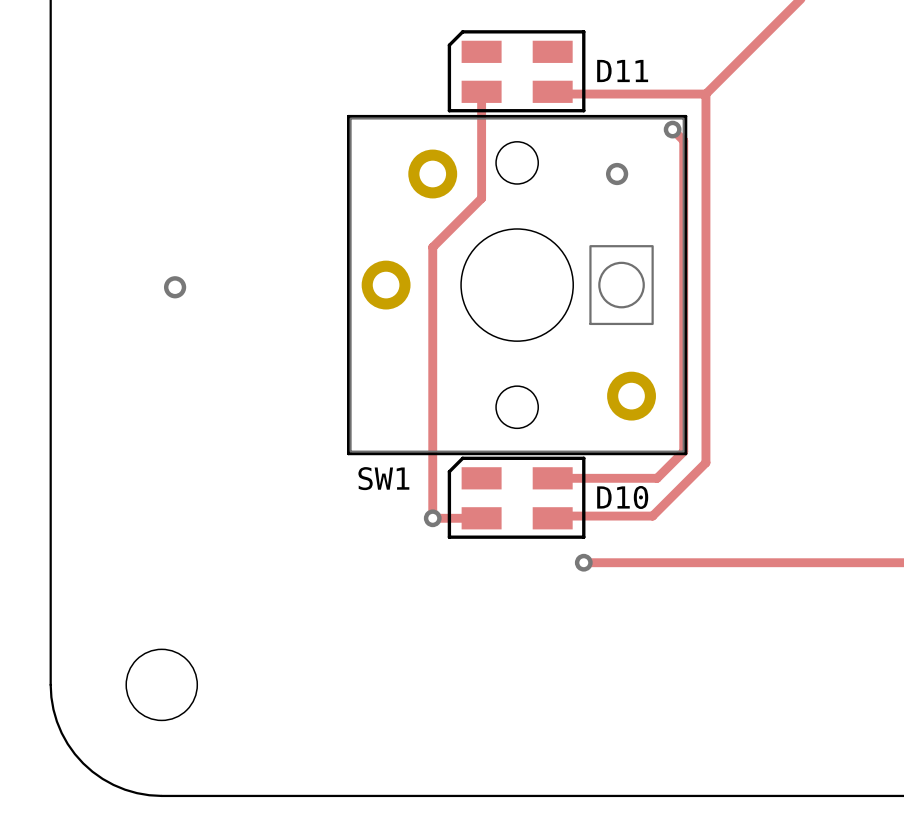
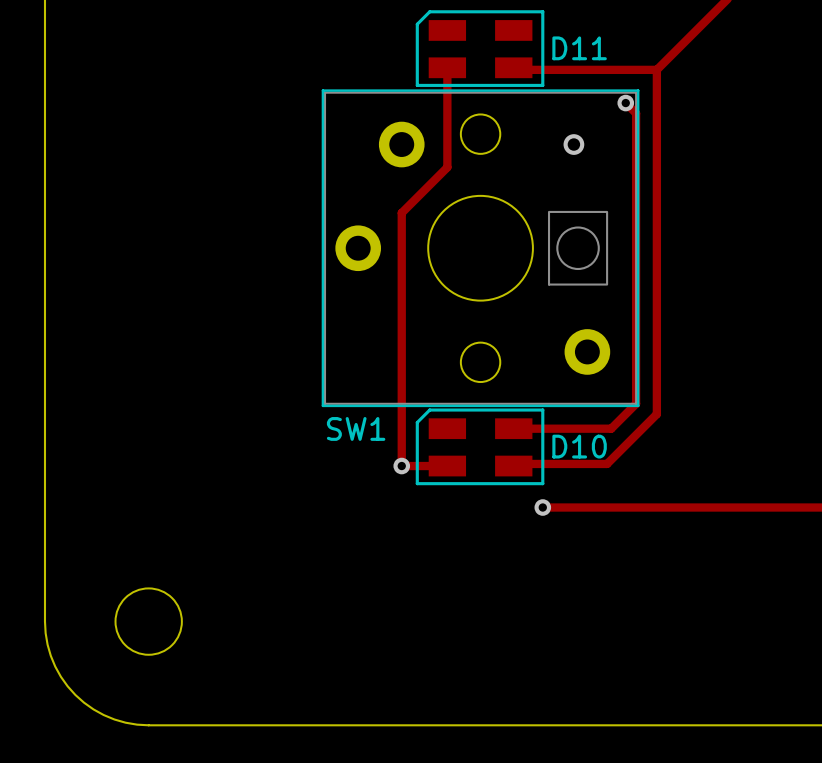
via: (175, 287) -> none

